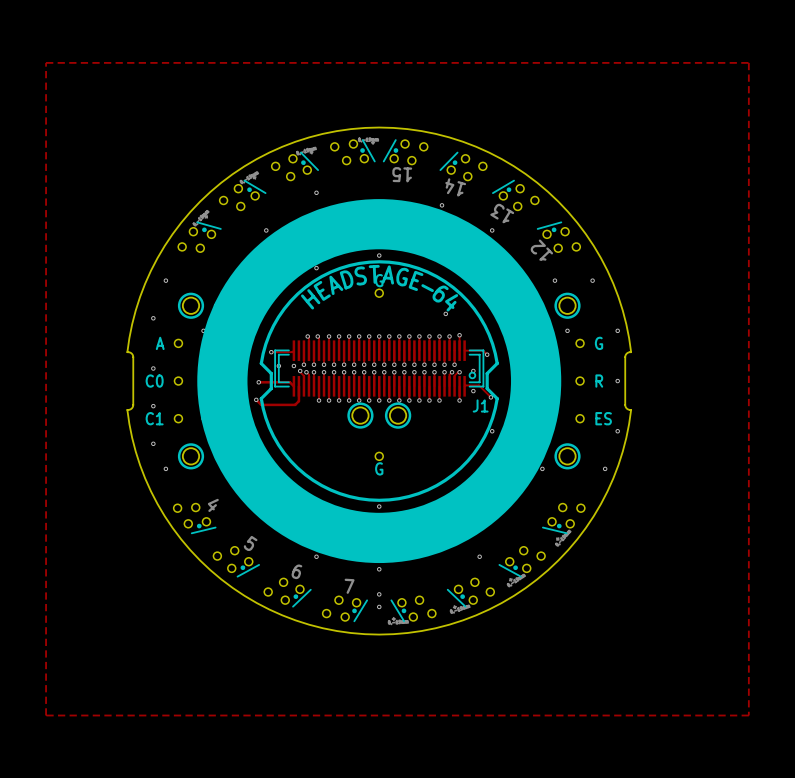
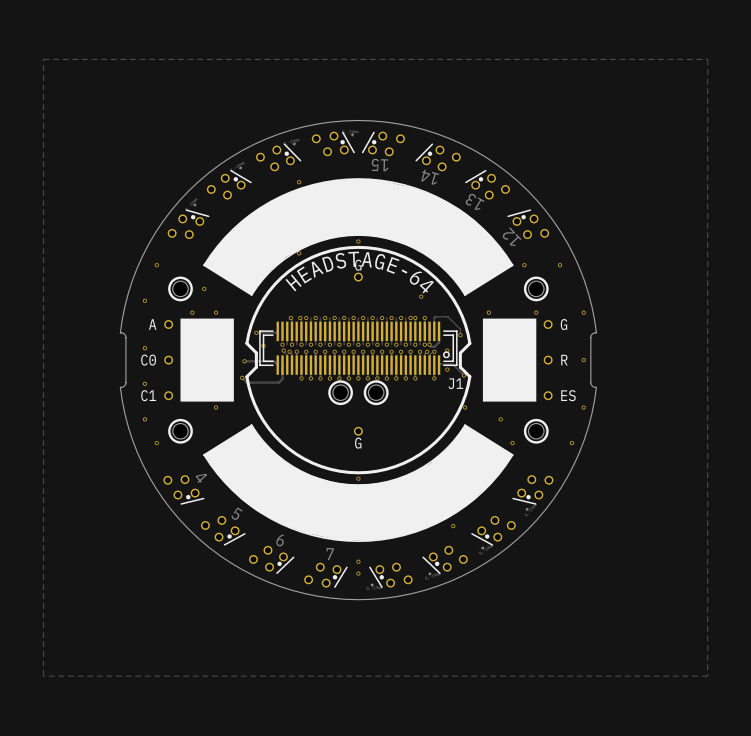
drawing: none -> [204, 179, 513, 295]
drawing: [197, 199, 562, 564] -> none
line: none -> (204, 265) (251, 294) (269, 271) (284, 258) (301, 248) (329, 238) (358, 235) (387, 238) (415, 248) (431, 258) (446, 271) (465, 294) (512, 265) (483, 229) (446, 202) (404, 184) (358, 179) (312, 184) (270, 202) (233, 229) (204, 265)
via: (459, 335) -> none
via: none -> (306, 317)
via: (329, 336) -> none
via: none -> (315, 317)
via: (339, 336) -> none
via: none -> (325, 317)
via: (349, 336) -> none
via: none -> (334, 317)
via: (359, 336) -> none
via: none -> (344, 317)
via: (369, 336) -> none
via: none -> (353, 317)
via: (379, 336) -> none
via: none -> (363, 317)
via: (389, 336) -> none
via: none -> (372, 317)
via: (399, 336) -> none
via: none -> (382, 317)
via: (409, 336) -> none
via: none -> (391, 317)
via: (419, 336) -> none
via: none -> (401, 317)
via: (429, 336) -> none
via: none -> (410, 317)
drawing: none -> [180, 318, 234, 402]
drawing: none -> [482, 318, 537, 402]
track: (464, 350) (483, 350) (487, 354) -> (434, 318) (436, 316) (447, 316) (460, 329) (460, 335)
track: none -> (439, 331) (439, 342) (434, 346) (430, 346)
via: none -> (282, 344)
via: (303, 364) -> none
via: none -> (291, 344)
via: (313, 364) -> none
via: none -> (301, 344)
via: (324, 364) -> none
via: none -> (310, 344)
via: (334, 364) -> none
via: none -> (320, 344)
via: (344, 364) -> none
via: none -> (329, 344)
via: (354, 364) -> none
via: none -> (339, 344)
via: (364, 364) -> none
via: none -> (348, 344)
via: (374, 364) -> none
via: none -> (358, 344)
via: (384, 364) -> none
via: none -> (367, 344)
via: (394, 364) -> none
via: none -> (377, 344)
via: (404, 364) -> none
via: none -> (386, 344)
via: (414, 364) -> none
via: none -> (396, 344)
via: (424, 364) -> none
via: none -> (405, 344)
via: (434, 364) -> none
via: none -> (415, 344)
via: (444, 364) -> none
via: none -> (424, 344)
via: (293, 365) -> none
drawing: none -> [204, 425, 513, 541]
line: none -> (251, 425) (204, 454) (210, 464) (241, 498) (270, 518) (301, 532) (335, 539) (369, 540) (392, 537) (436, 523) (475, 498) (499, 473) (512, 454) (465, 425) (446, 448) (431, 461) (415, 471) (387, 481) (368, 484) (348, 484) (319, 479) (292, 466) (269, 448) (251, 425)

